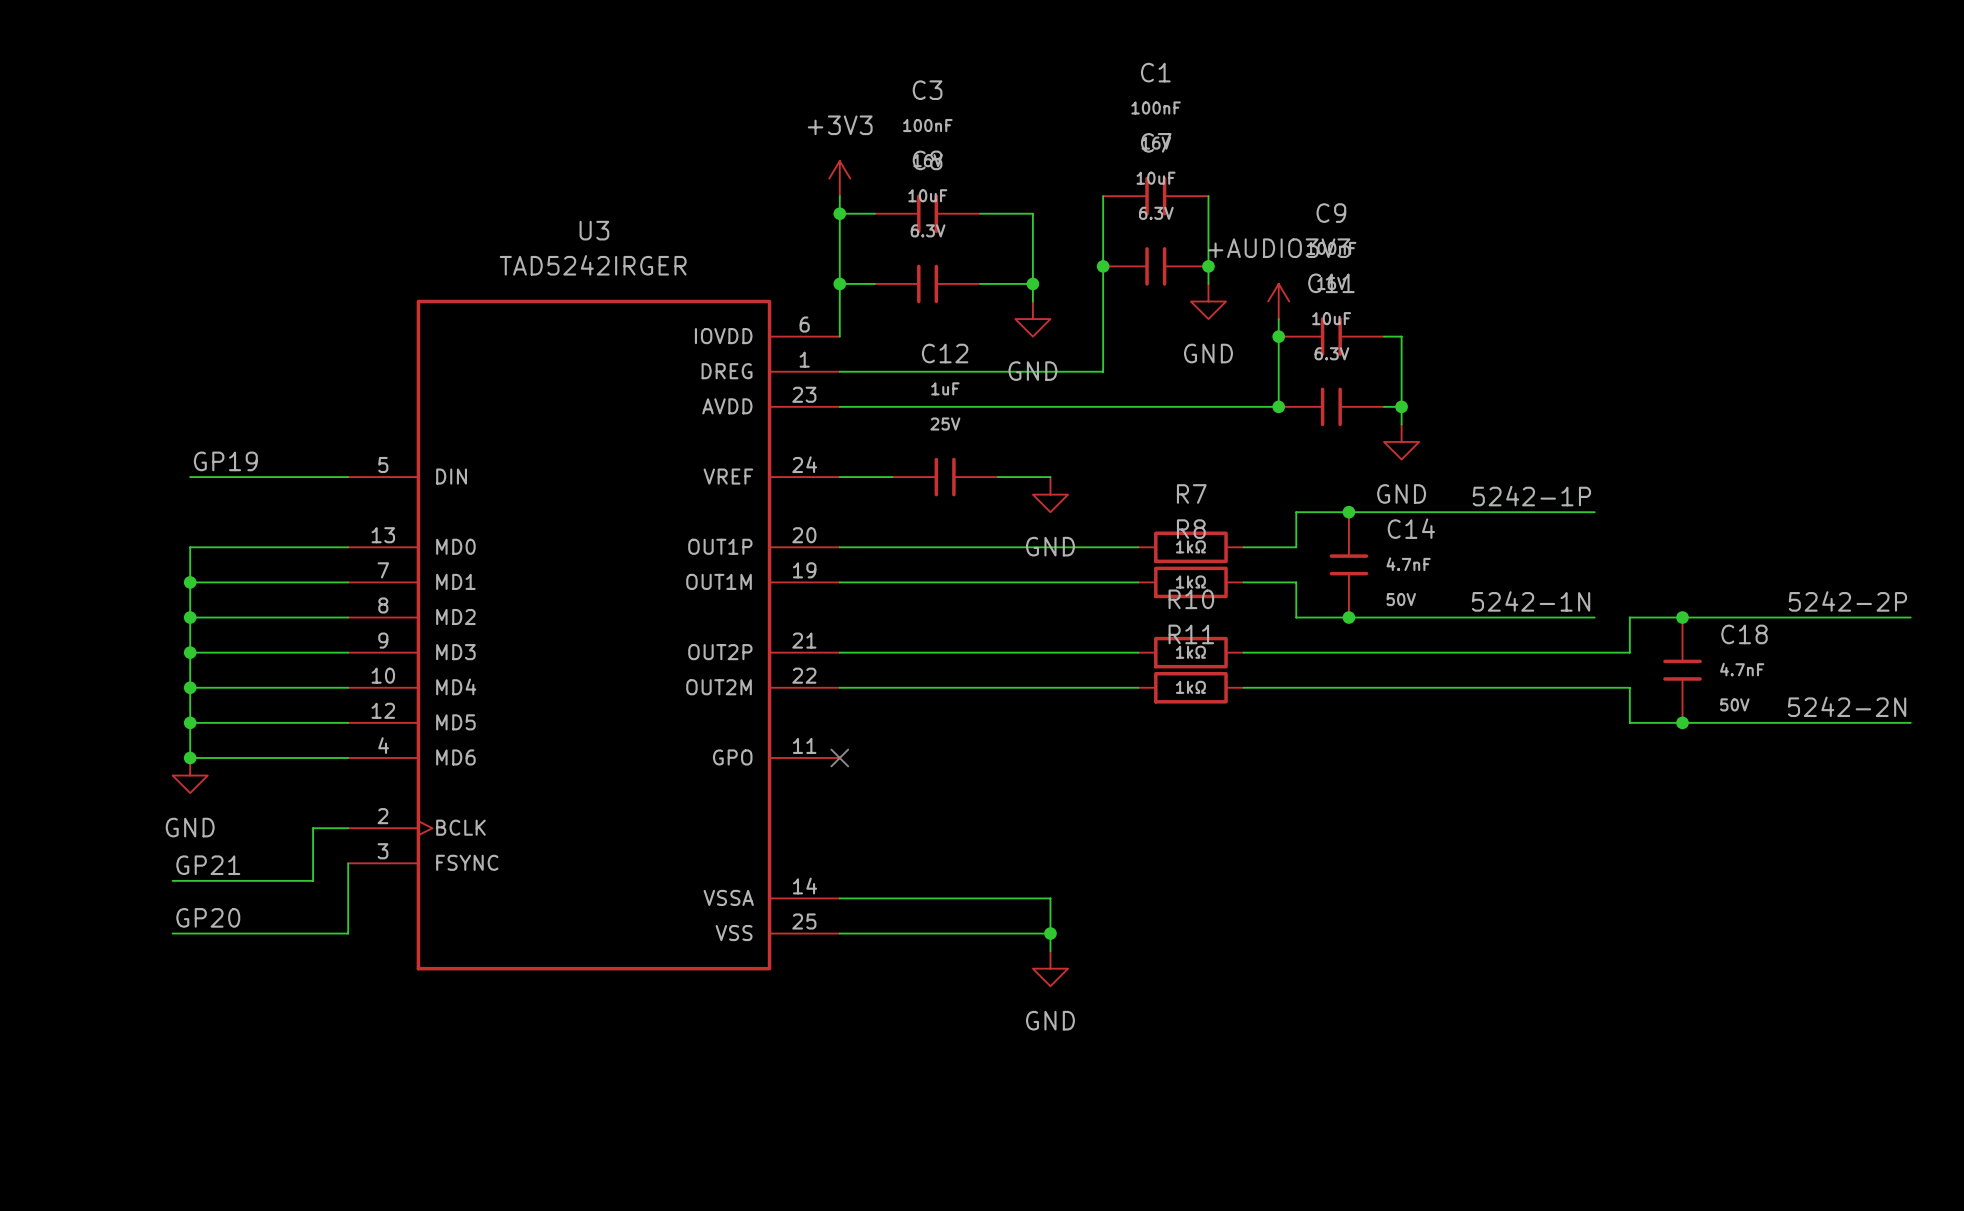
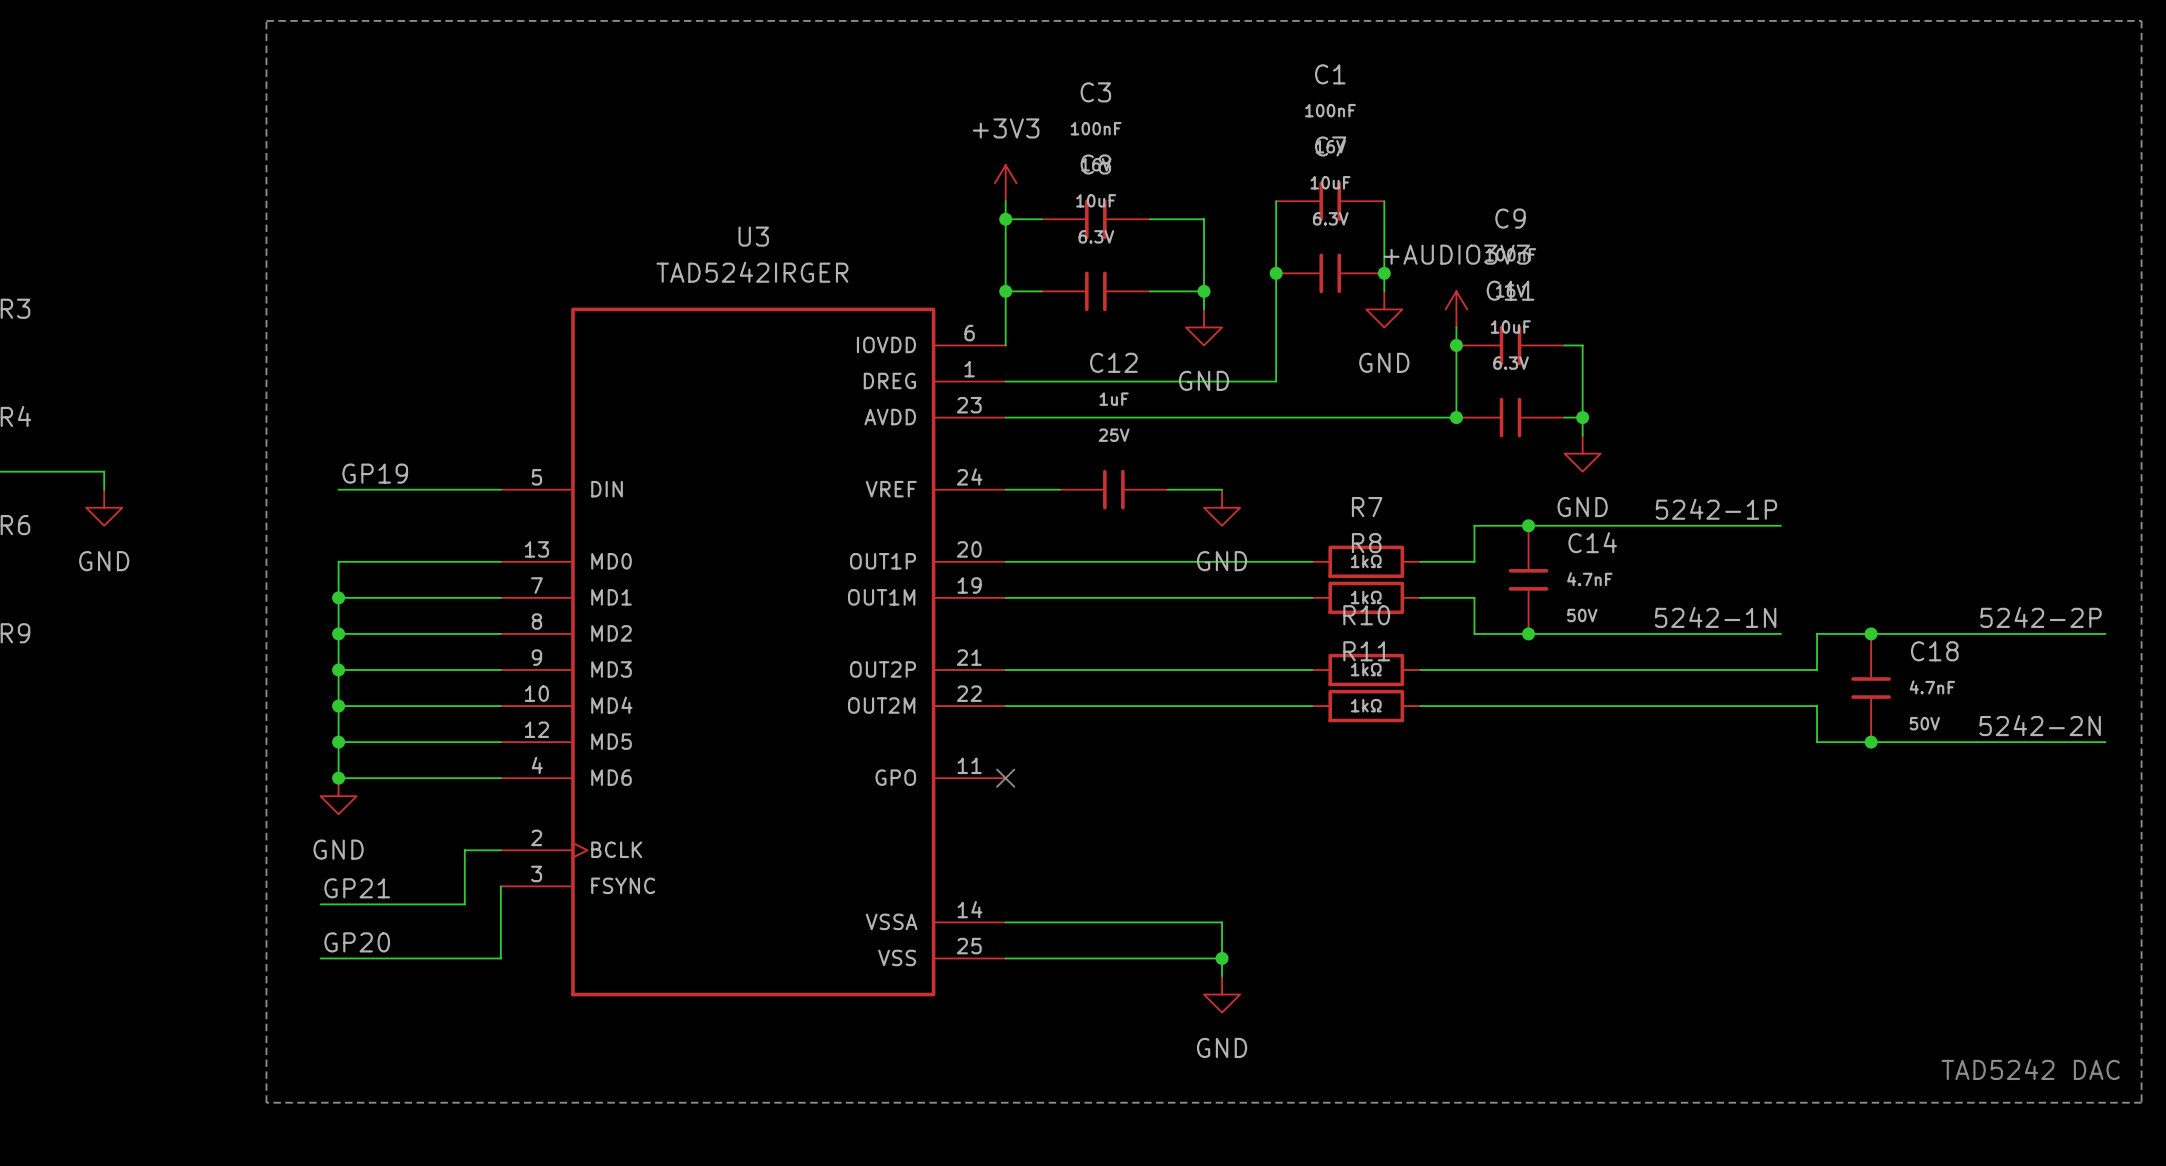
line: none -> (266, 20) (2141, 20) (2141, 1102) (266, 1102) (266, 20)
text: none -> TAD5242 DAC (2030, 1069)

